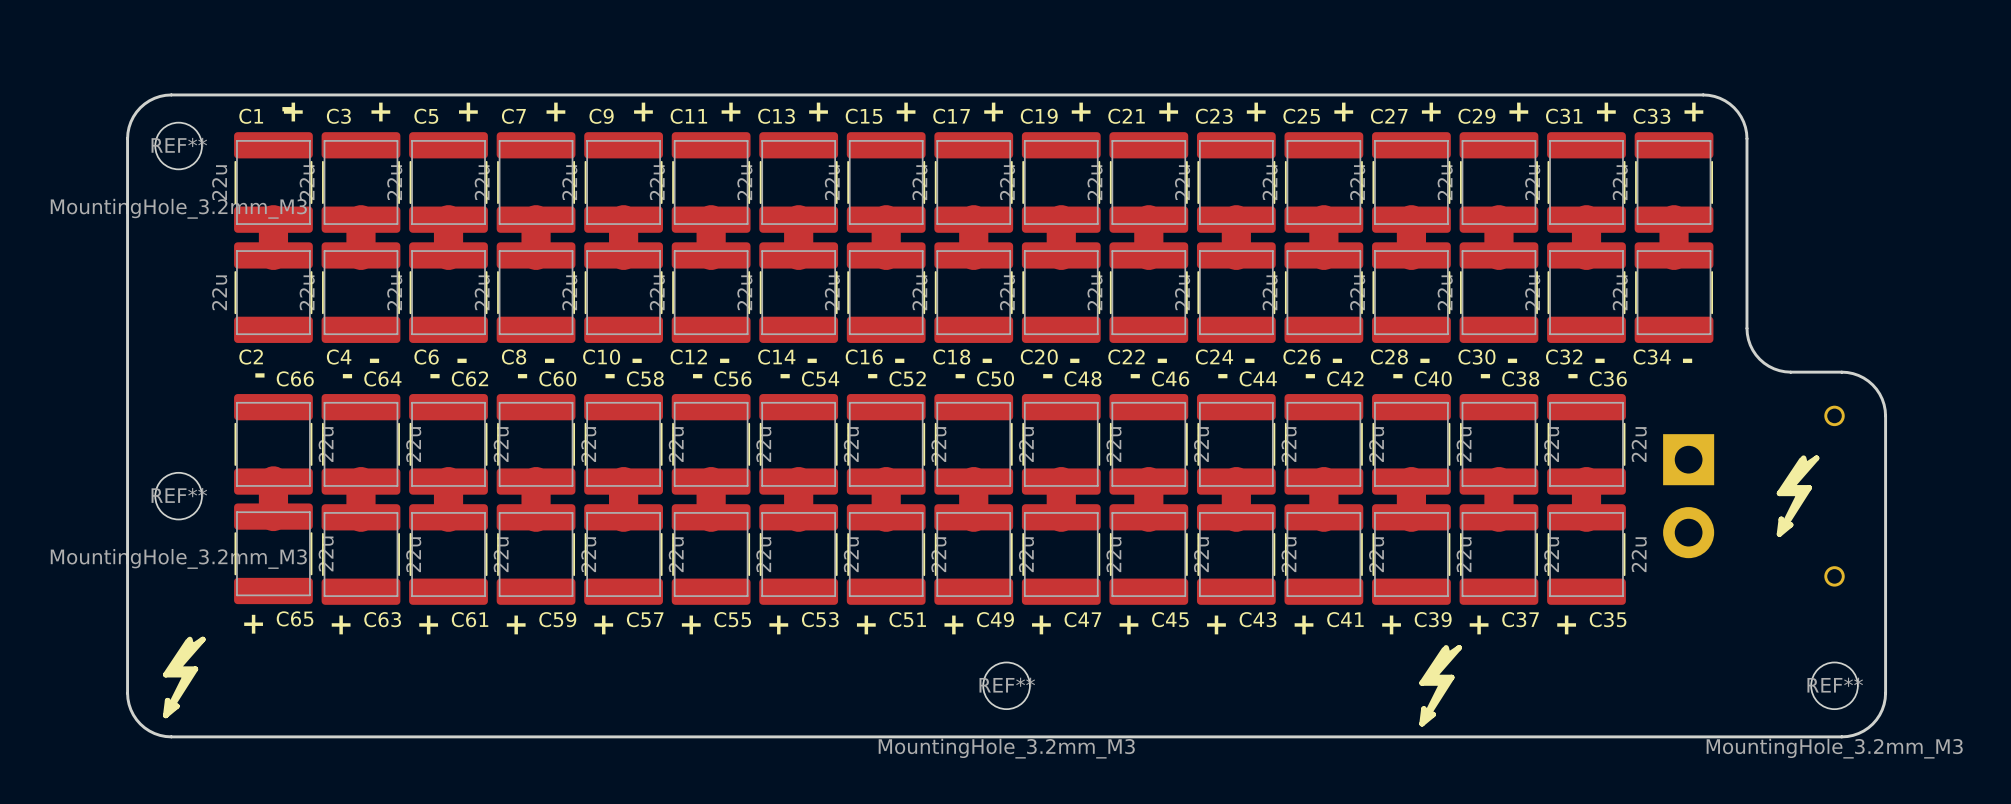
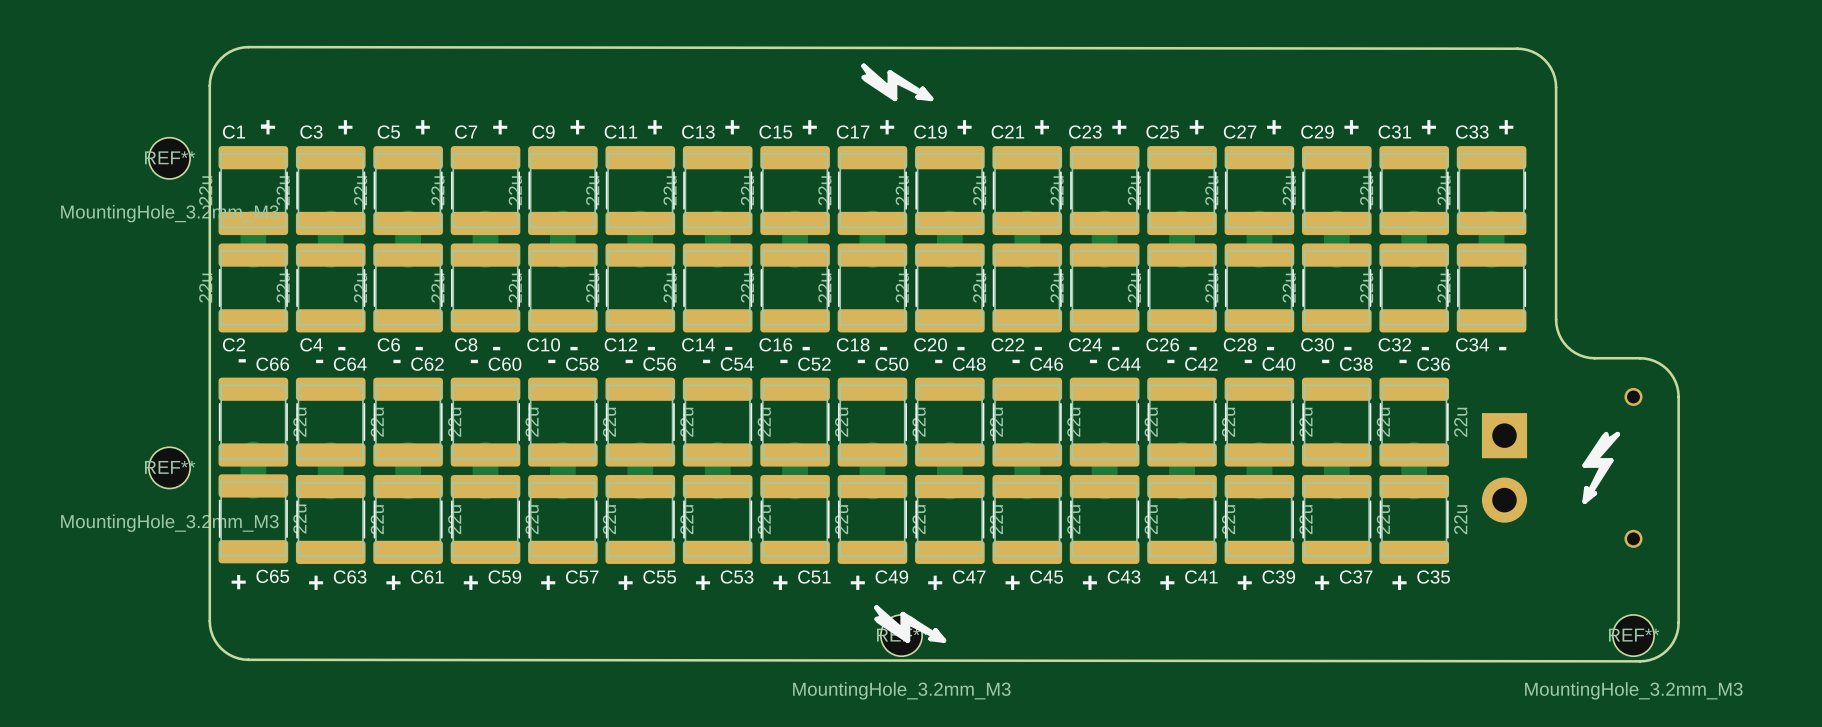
drawing: none -> [861, 63, 934, 102]
board edge: (1746, 138) (1743, 121) (1734, 107) (1719, 98) (1703, 94) (171, 94) (154, 98) (144, 103) (133, 116) (127, 138) (129, 704) (136, 719) (144, 727) (160, 735) (171, 736) (1841, 736) (1863, 731) (1879, 714) (1885, 698) (1885, 671) -> (1556, 151) (1554, 77) (1544, 60) (1532, 51) (1522, 49) (248, 47) (233, 50) (221, 58) (214, 66) (209, 85) (211, 631) (217, 644) (224, 651) (233, 656) (248, 659) (1639, 661) (1654, 658) (1667, 650) (1675, 637) (1678, 622)
drawing: [162, 636, 206, 719] -> none
drawing: [1419, 645, 1462, 727] -> none
drawing: none -> [874, 605, 947, 643]

